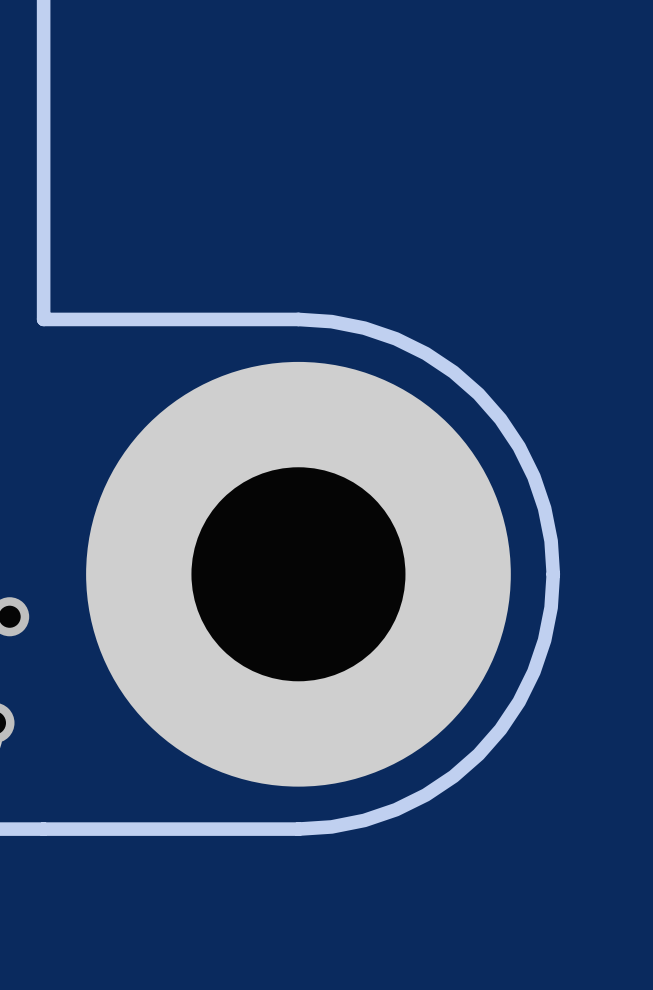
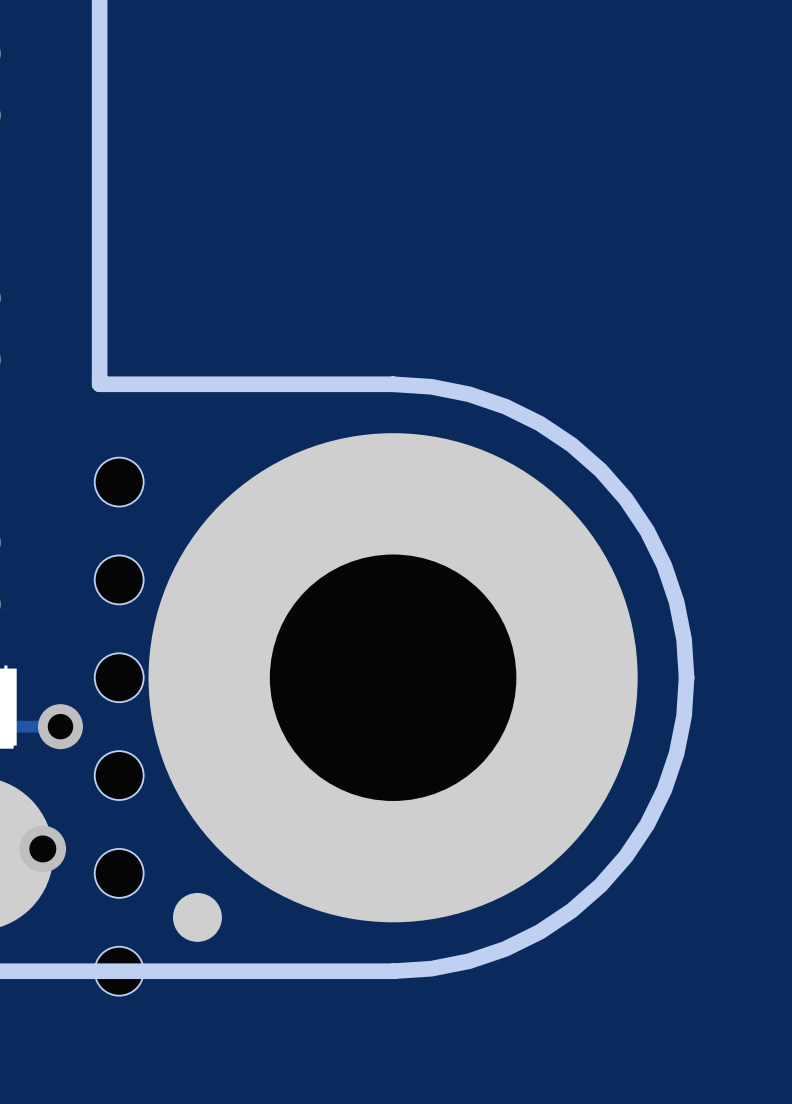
hole: none -> (119, 482)
hole: none -> (119, 579)
hole: none -> (119, 677)
hole: none -> (119, 775)
hole: none -> (119, 873)
part: none -> (197, 917)
hole: none -> (119, 971)

